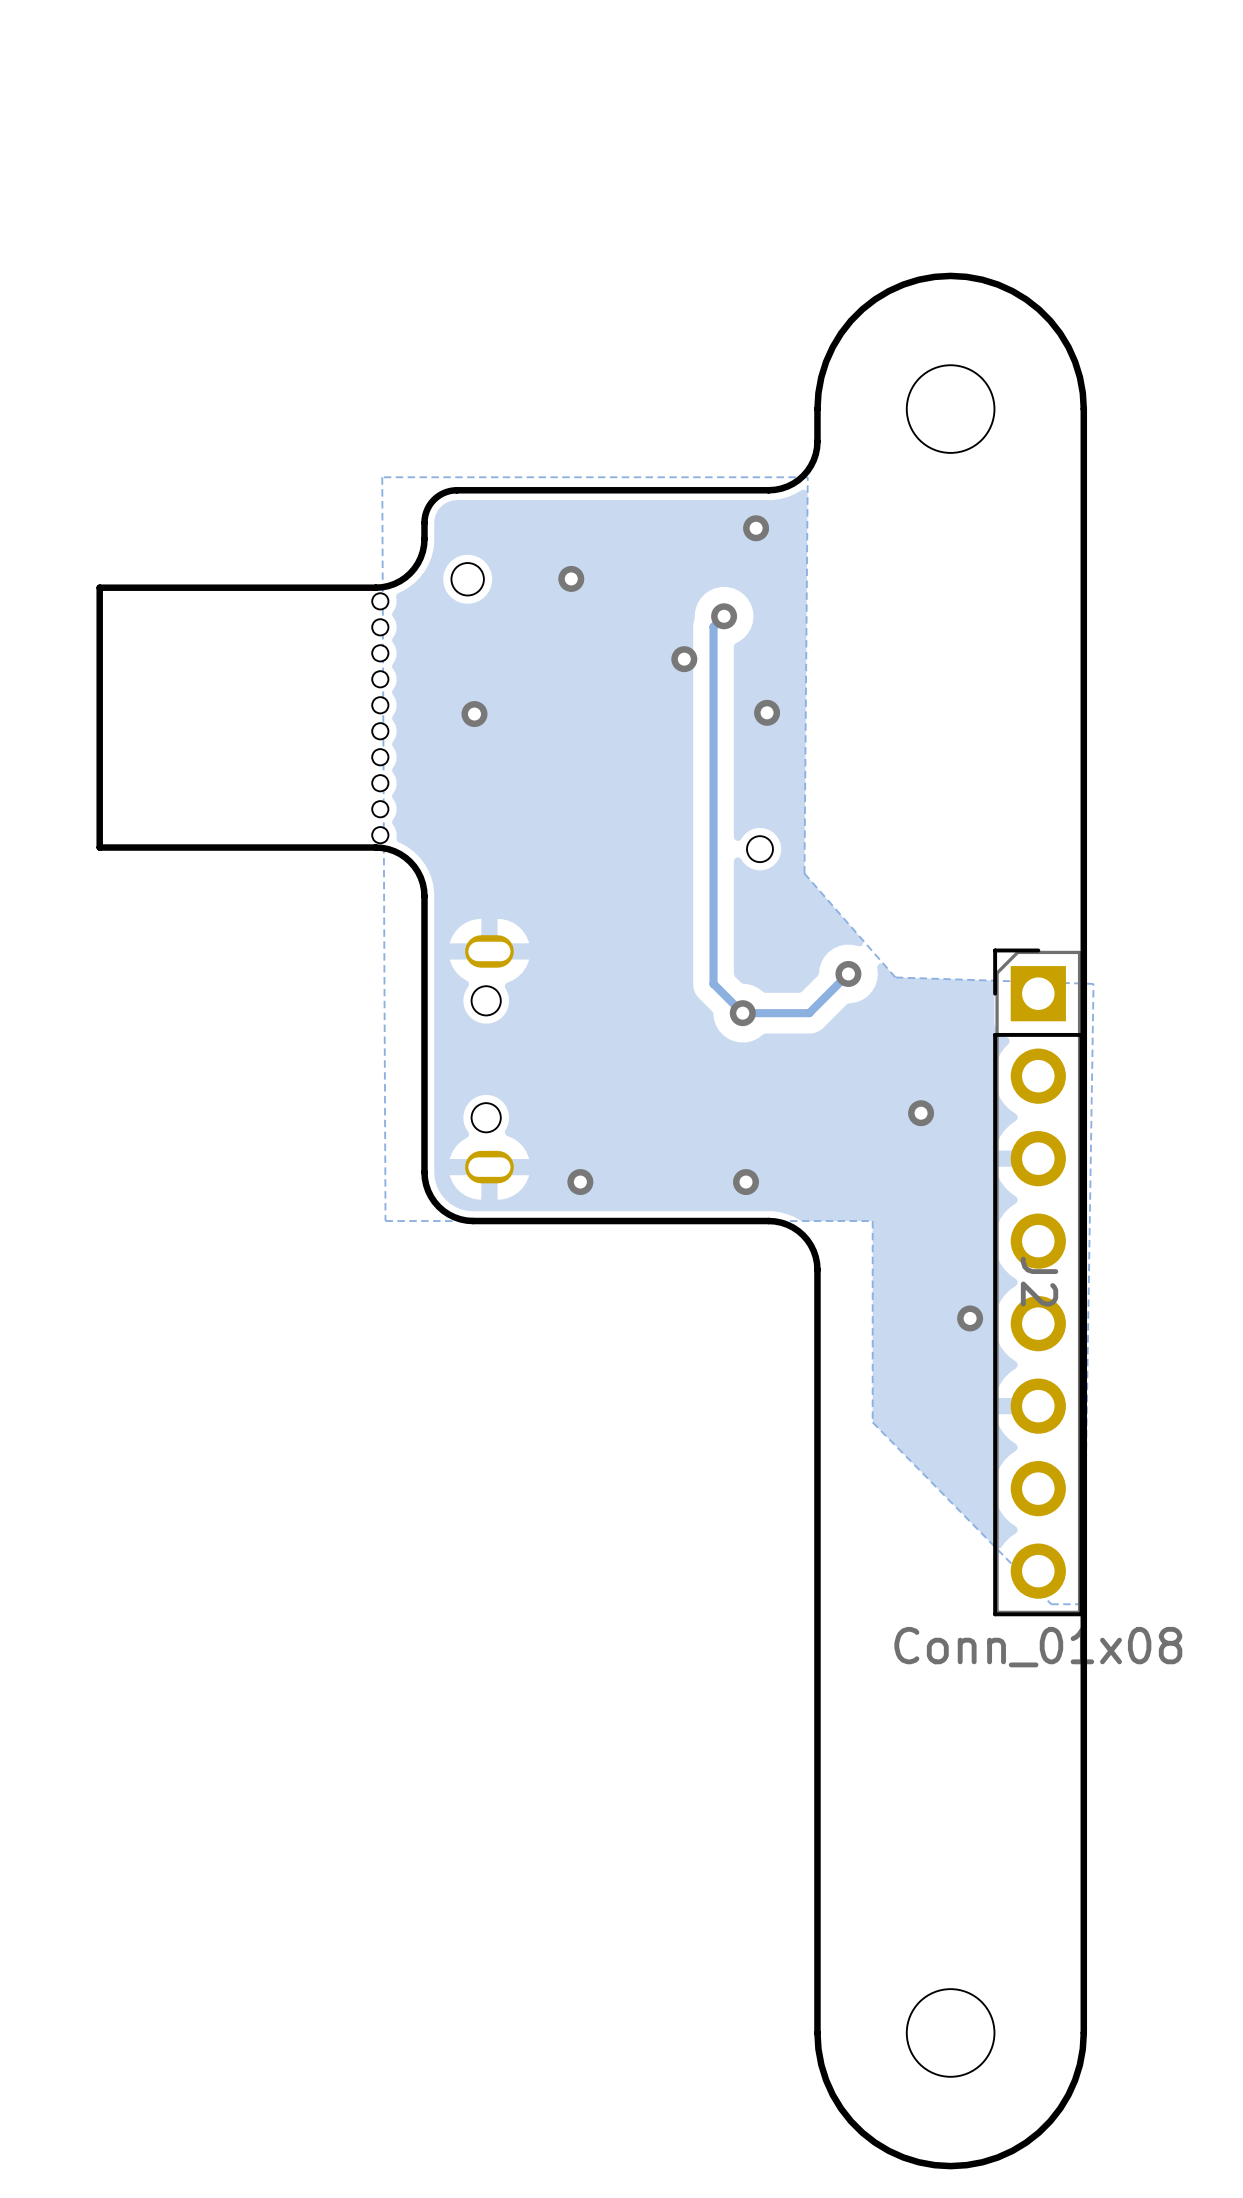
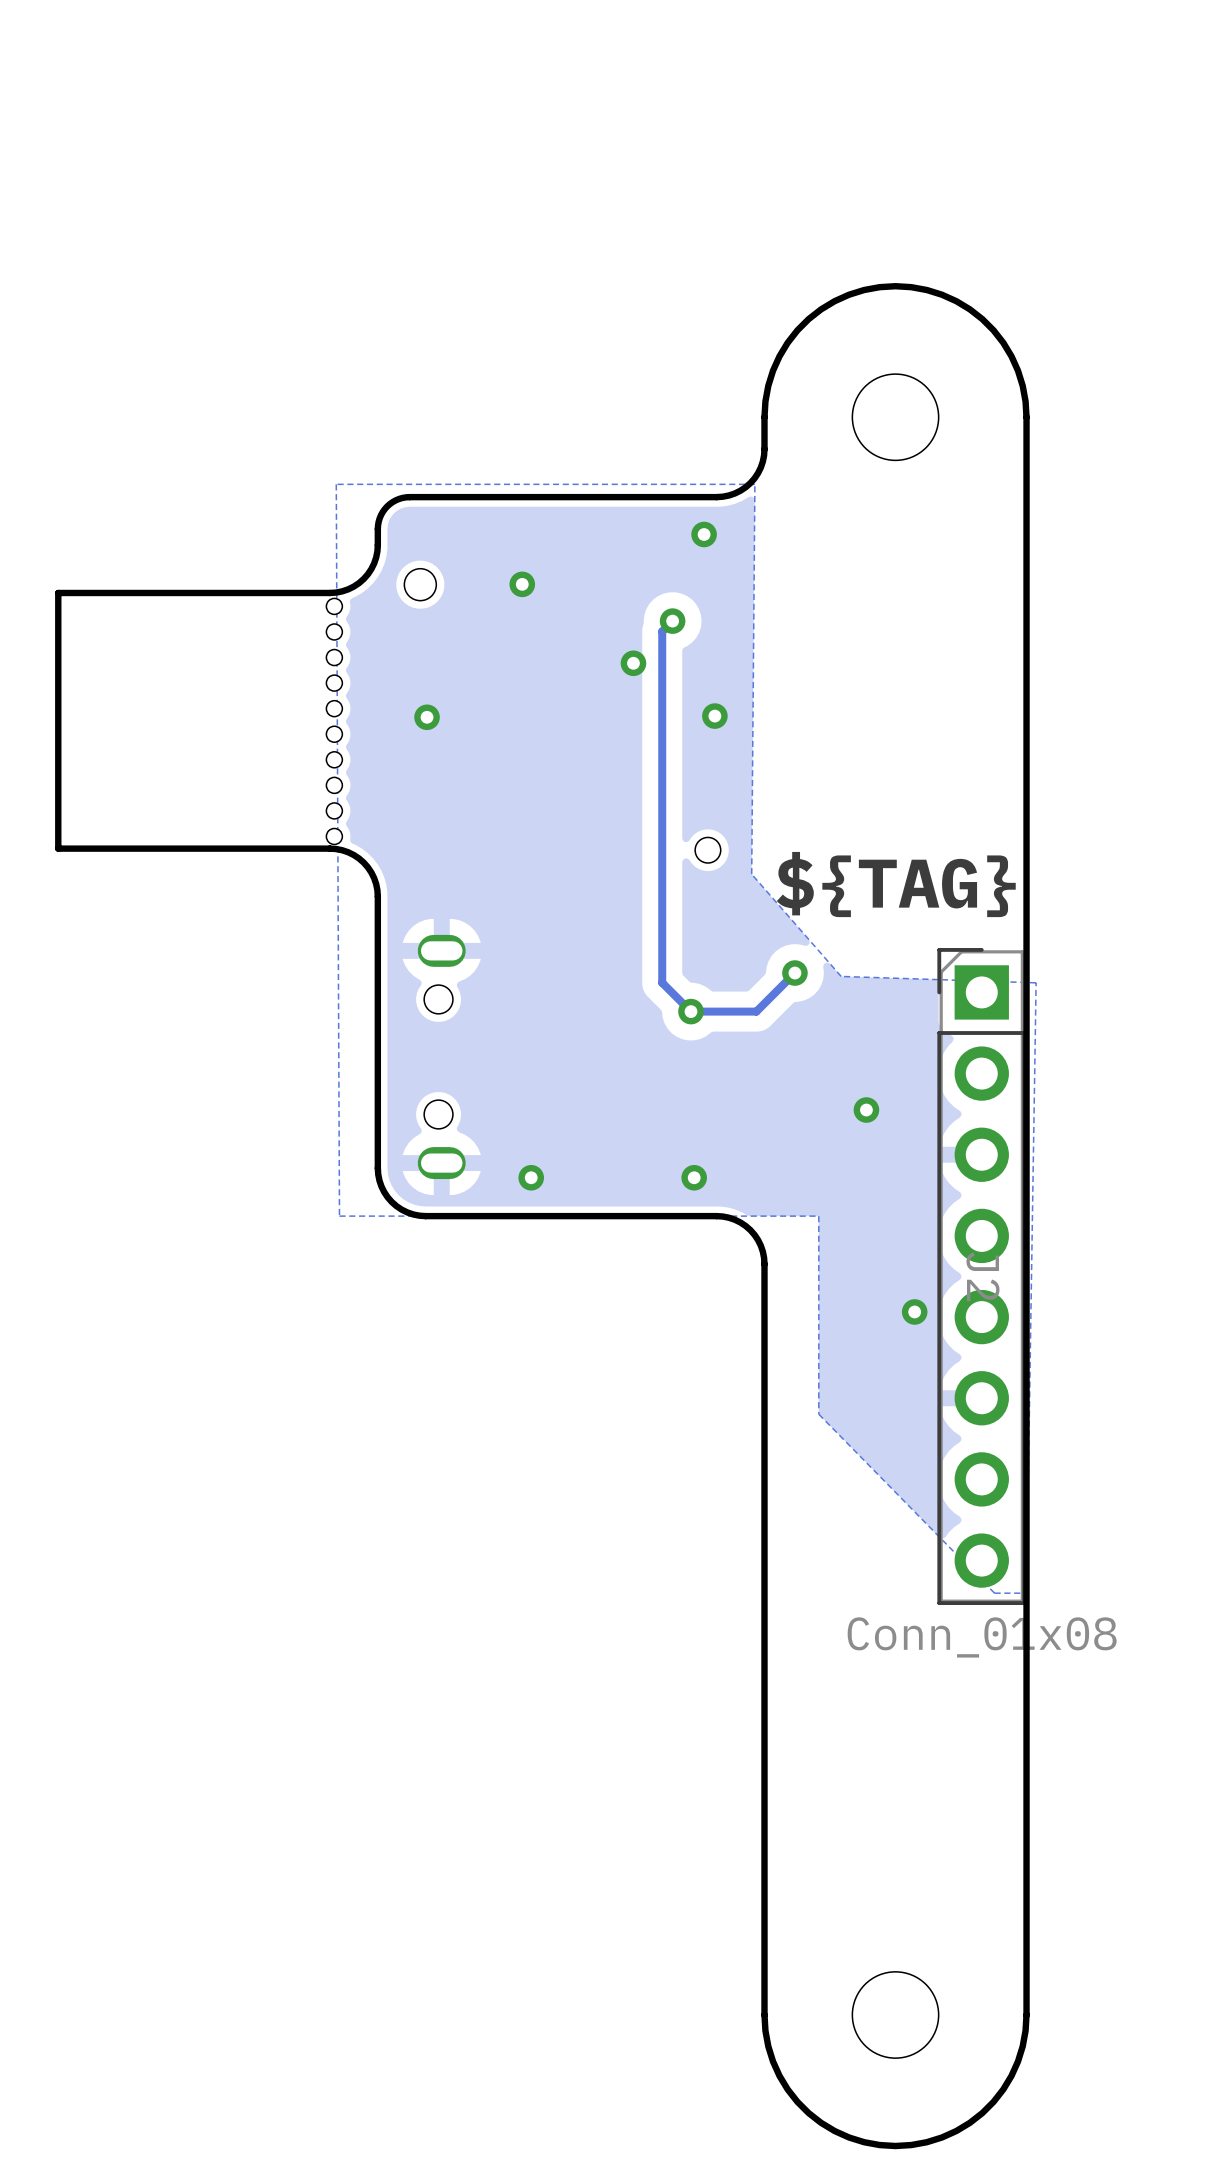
text: none -> ${TAG} (896, 884)

